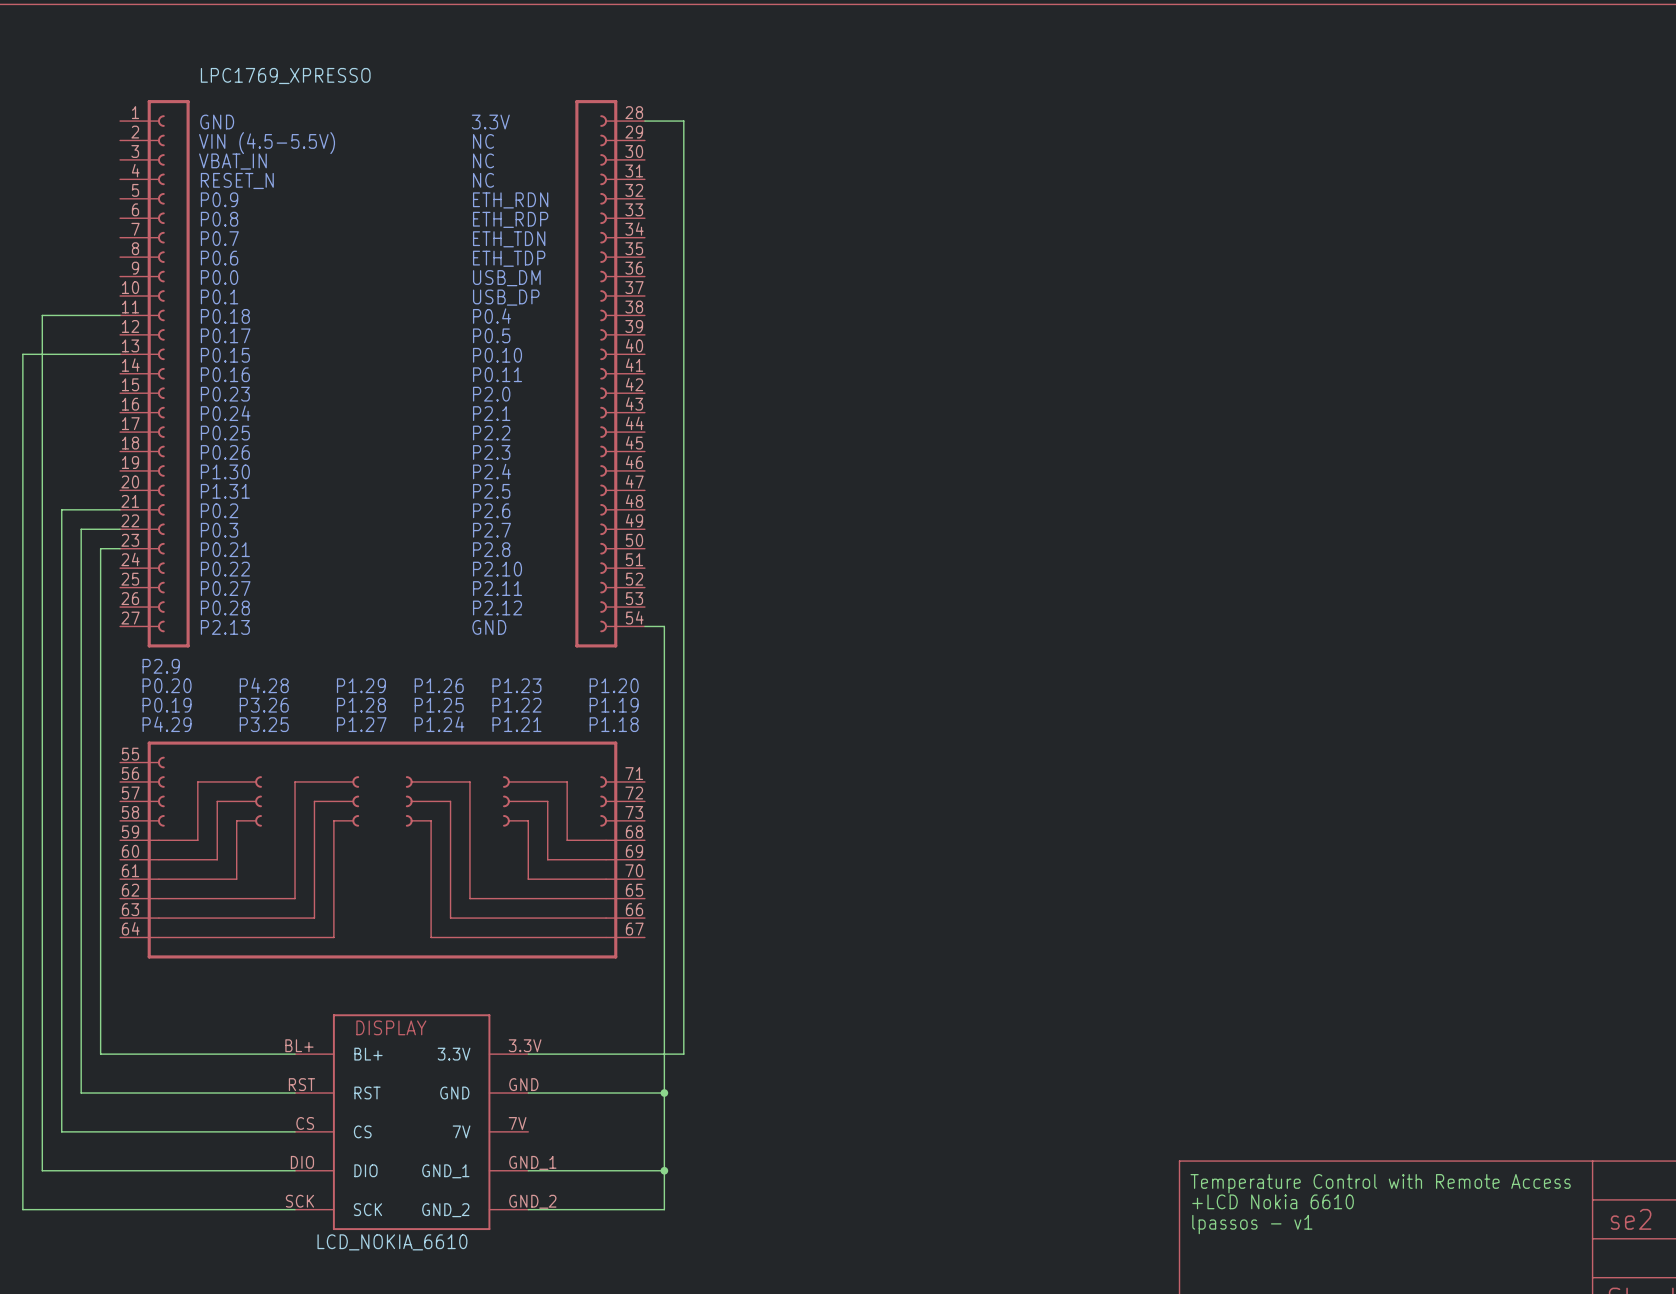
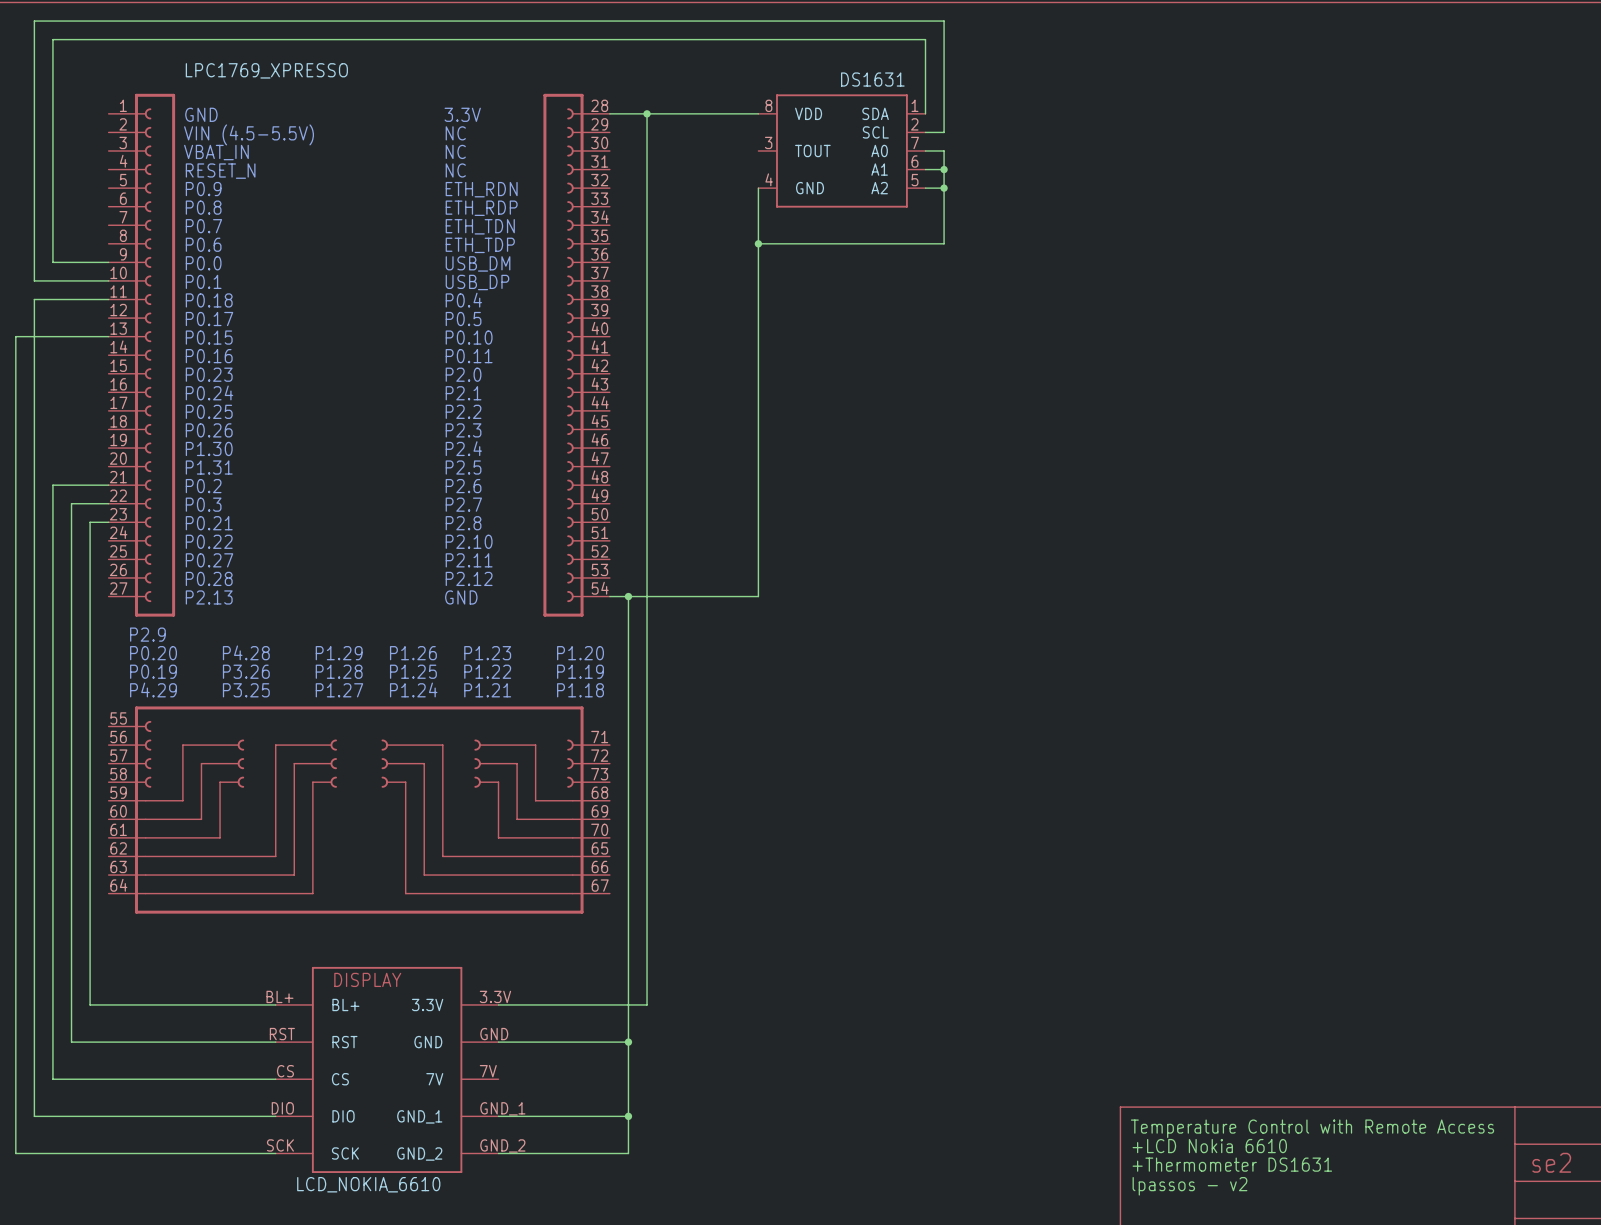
wire: none -> (647, 113) (758, 113)
junction: none -> (647, 113)
wire: none -> (925, 113) (925, 39) (52, 39) (52, 262) (108, 262)
wire: none -> (925, 132) (944, 132) (944, 21) (34, 21) (34, 280) (108, 280)
DS1631: none -> (841, 150)
wire: none -> (925, 150) (944, 150) (944, 243) (758, 243)
wire: none -> (925, 169) (944, 169)
junction: none -> (944, 169)
wire: none -> (758, 188) (758, 596) (628, 596)
wire: none -> (925, 188) (944, 188)
junction: none -> (944, 188)
junction: none -> (758, 243)
junction: none -> (628, 596)
text: lpassos - v1 (1252, 1224) -> +Thermometer DS1631 (1232, 1164)
text: none -> lpassos - v2 (1189, 1186)

